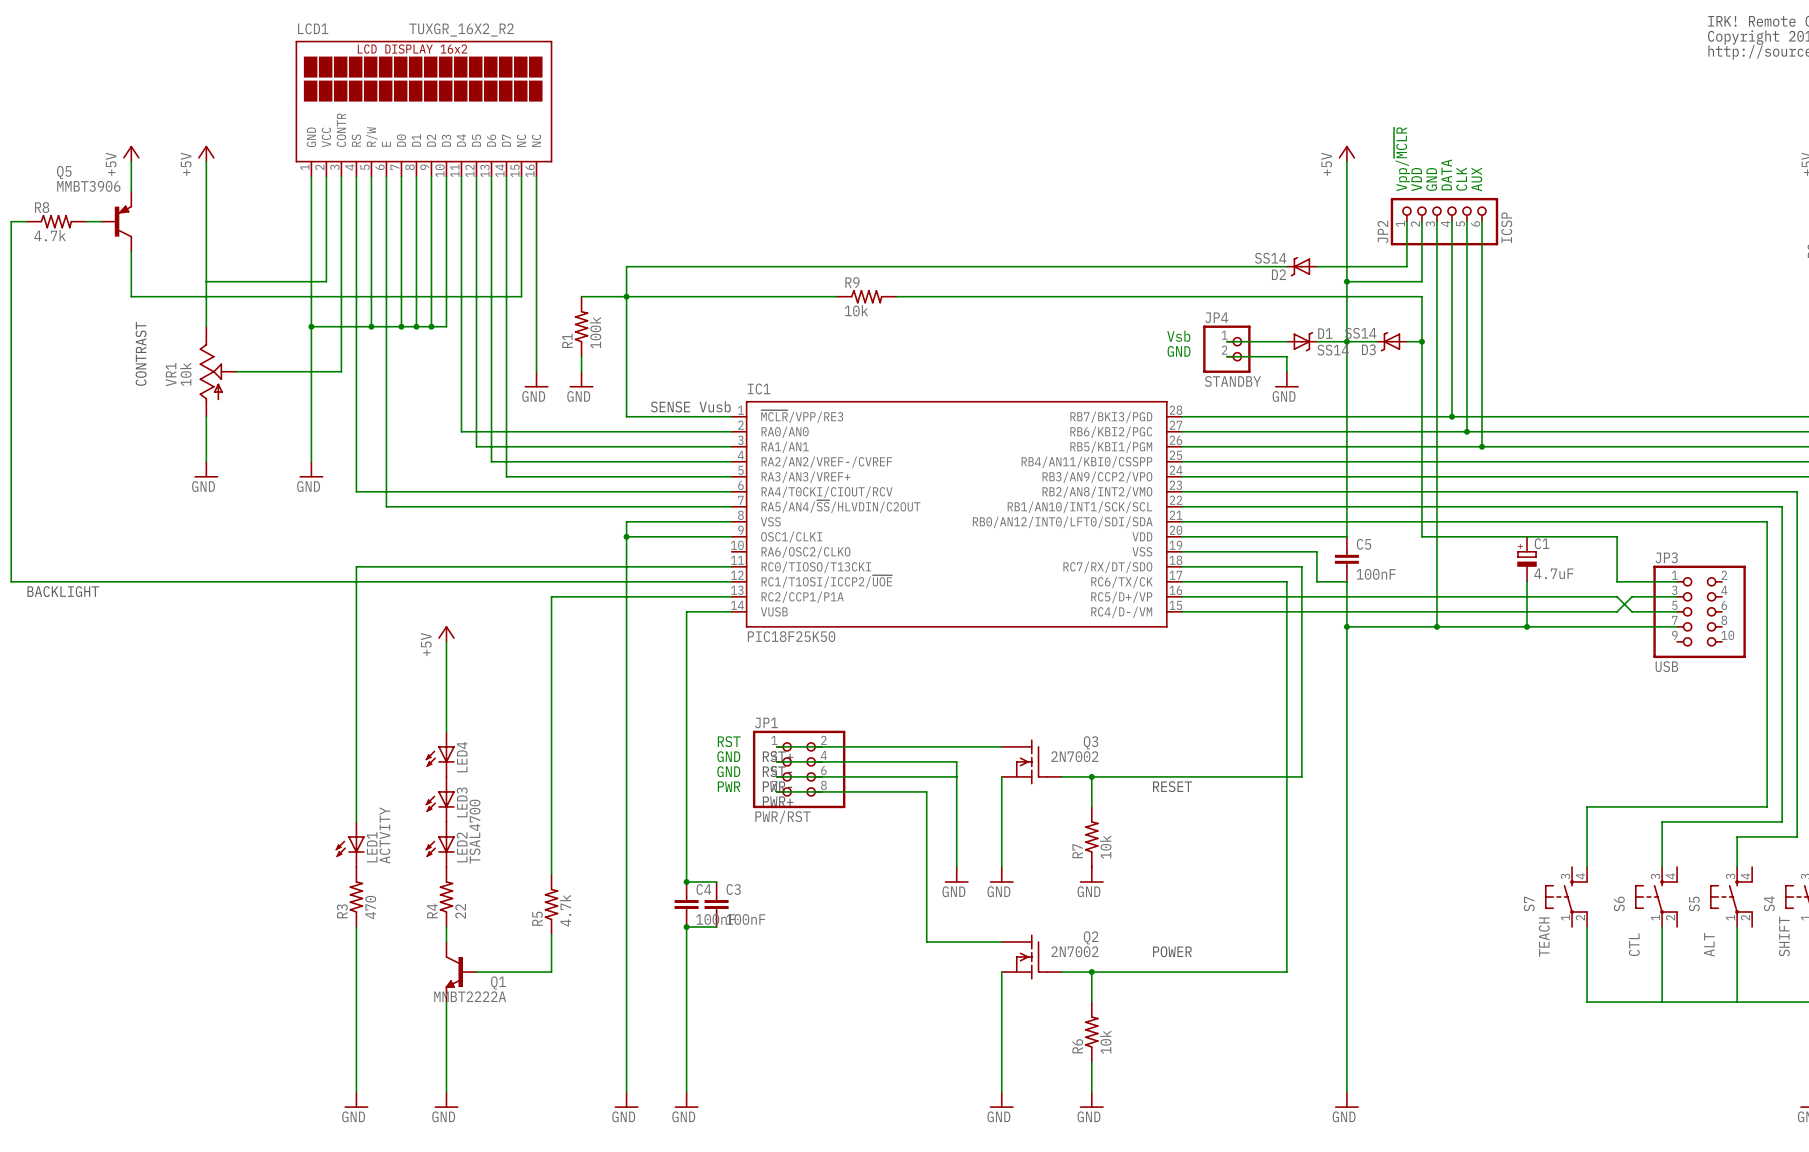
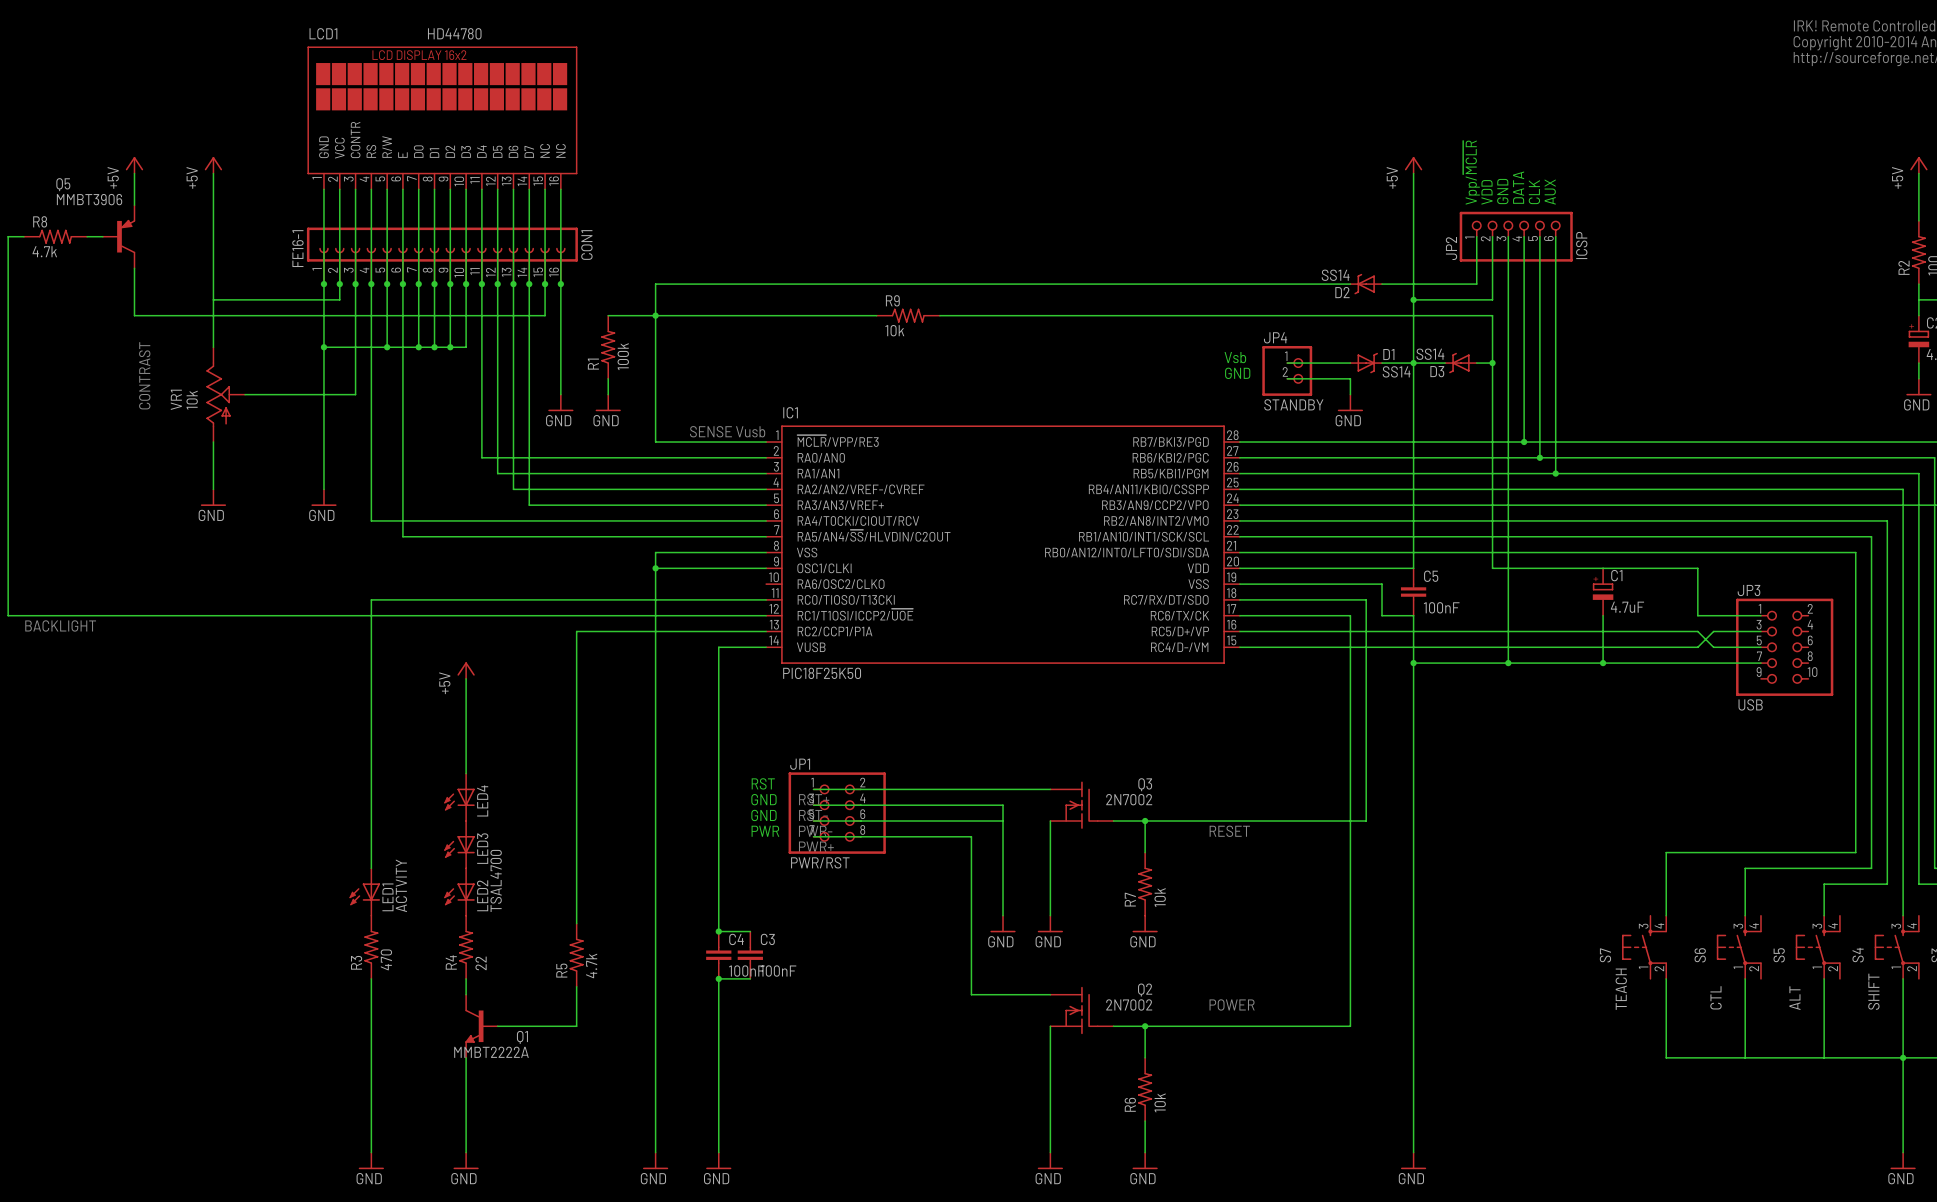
LCD1 value: TUXGR_16X2_R2 (461, 29) -> HD44780 (454, 33)
CON1: none -> FE16-1 (442, 255)
junction: none -> (323, 284)
junction: none -> (339, 284)
junction: none -> (355, 284)
junction: none -> (371, 284)
junction: none -> (387, 284)
junction: none -> (402, 284)
junction: none -> (418, 284)
junction: none -> (434, 284)
junction: none -> (450, 284)
junction: none -> (466, 284)
junction: none -> (481, 284)
junction: none -> (497, 284)
junction: none -> (513, 284)
junction: none -> (529, 284)
junction: none -> (545, 284)
junction: none -> (560, 284)

